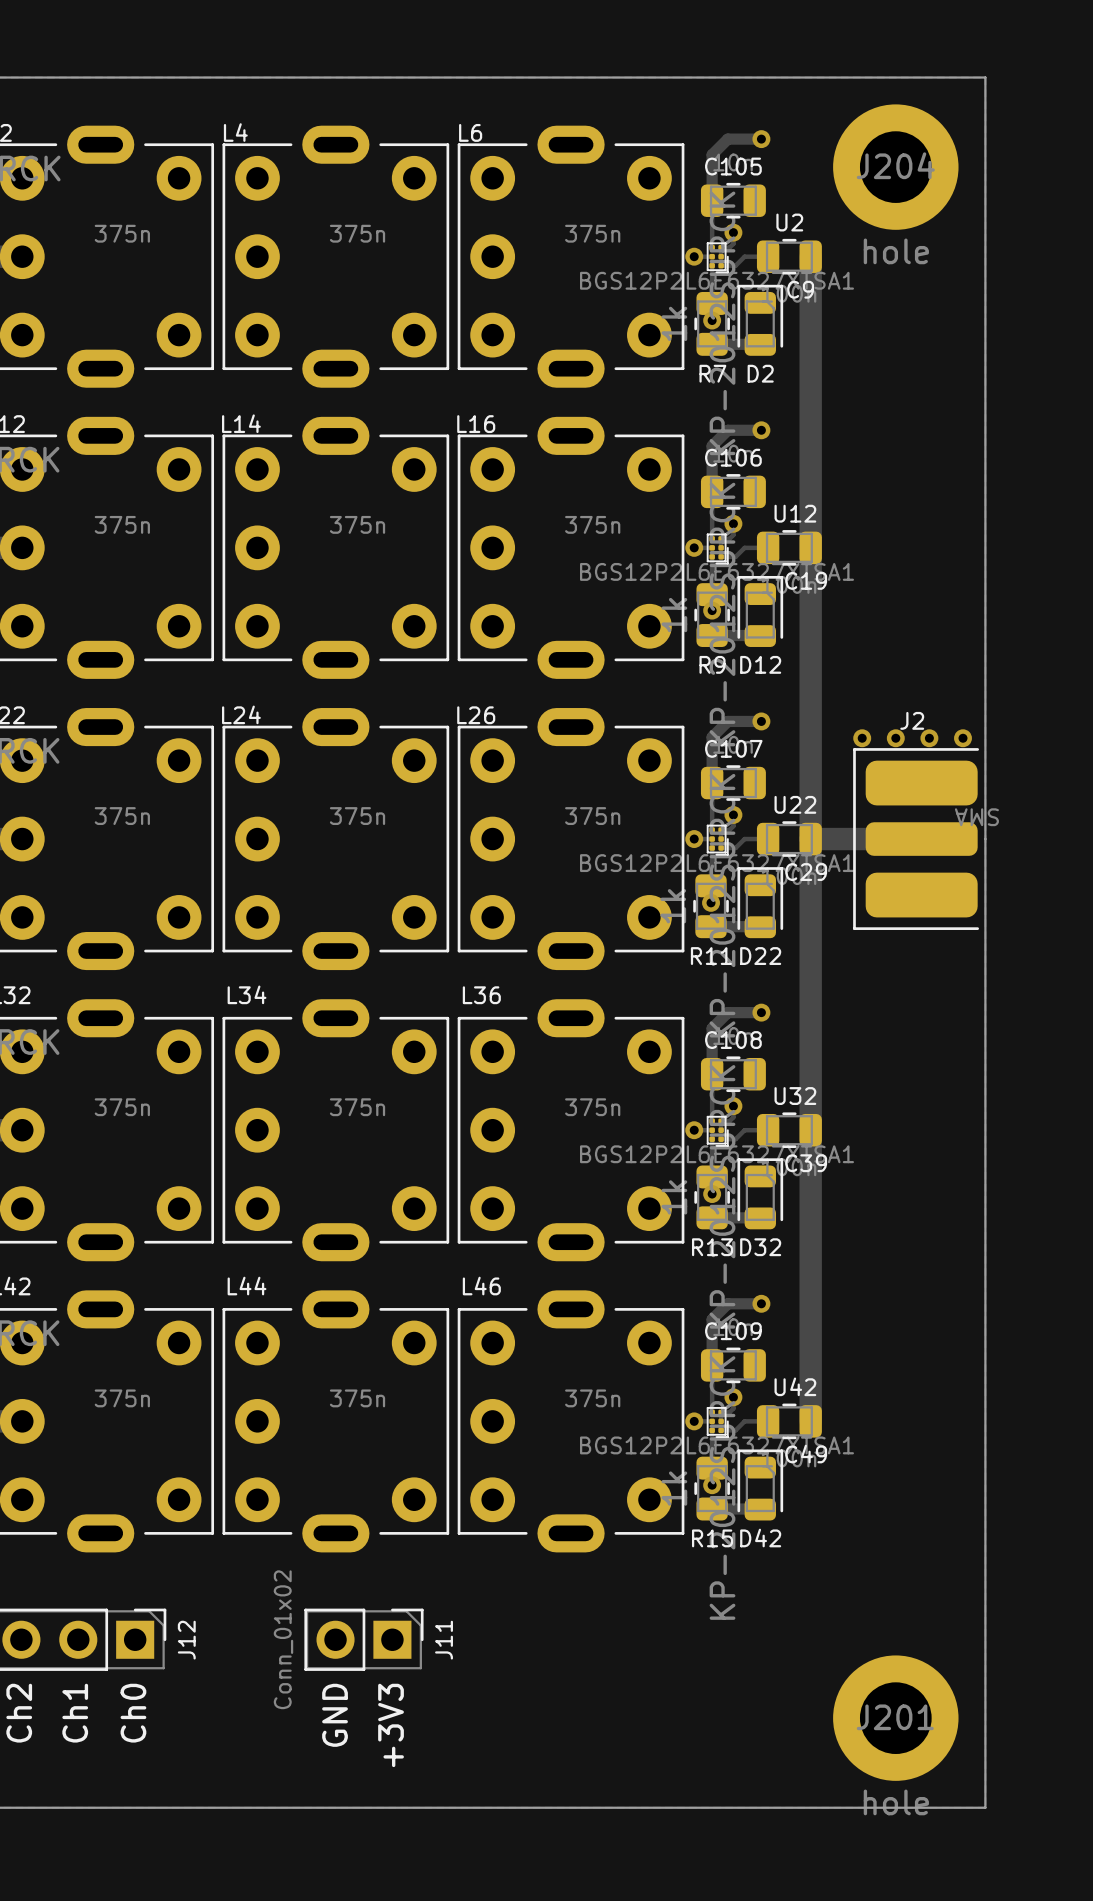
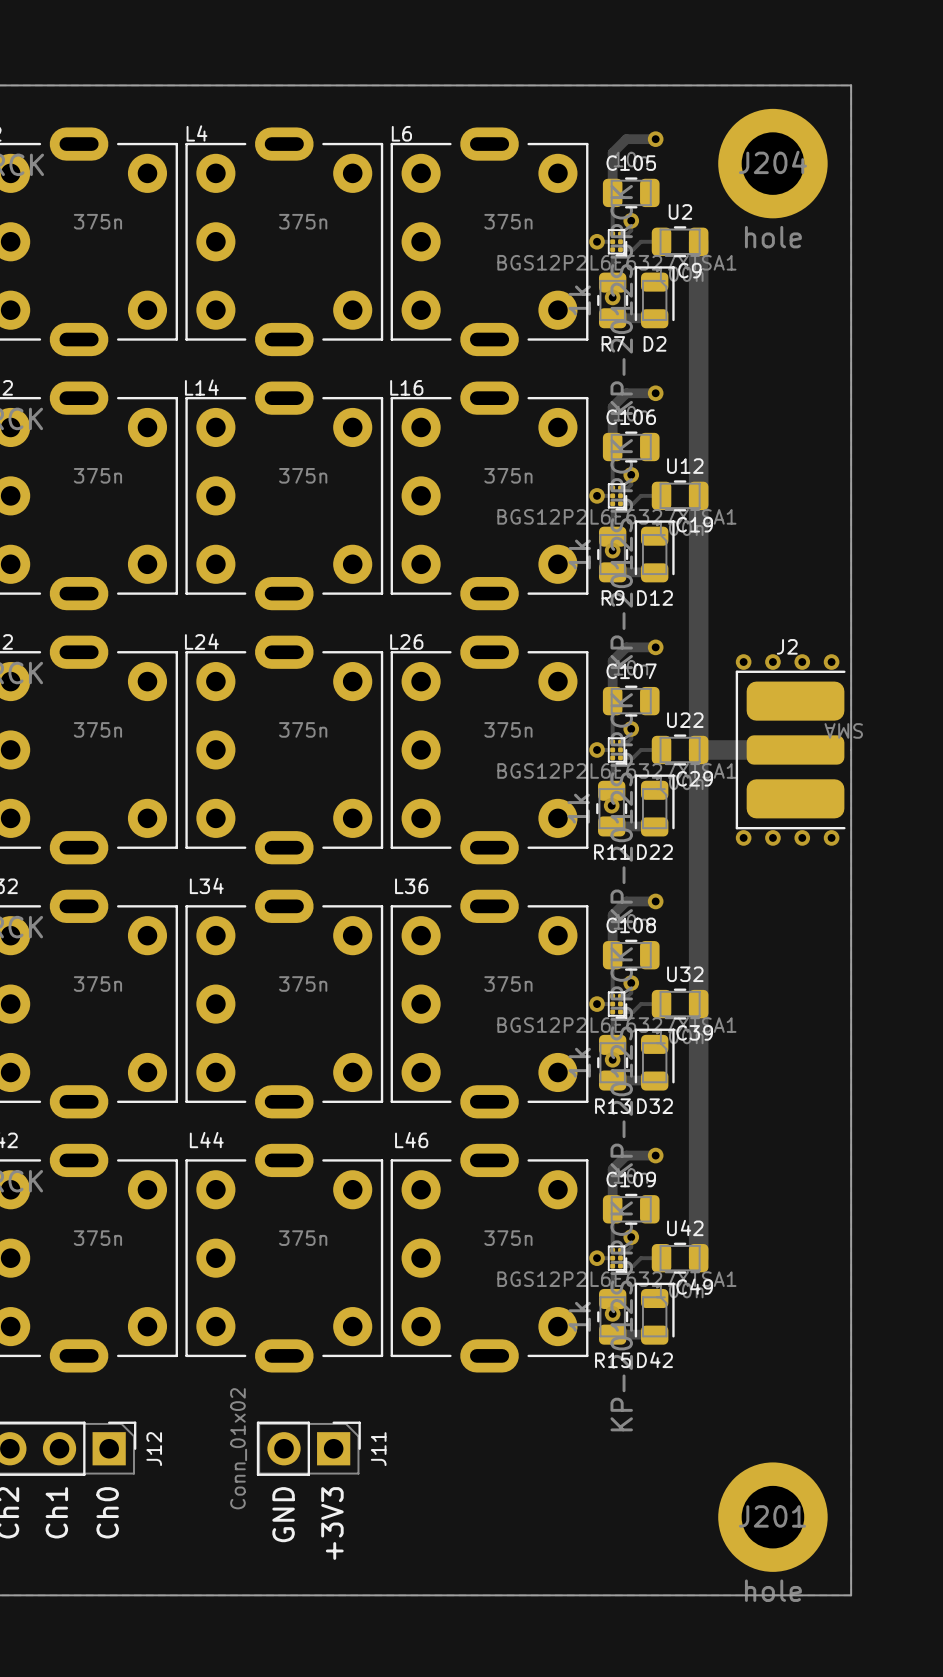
via: none -> (743, 837)
via: none -> (772, 837)
via: none -> (802, 837)
via: none -> (831, 837)

